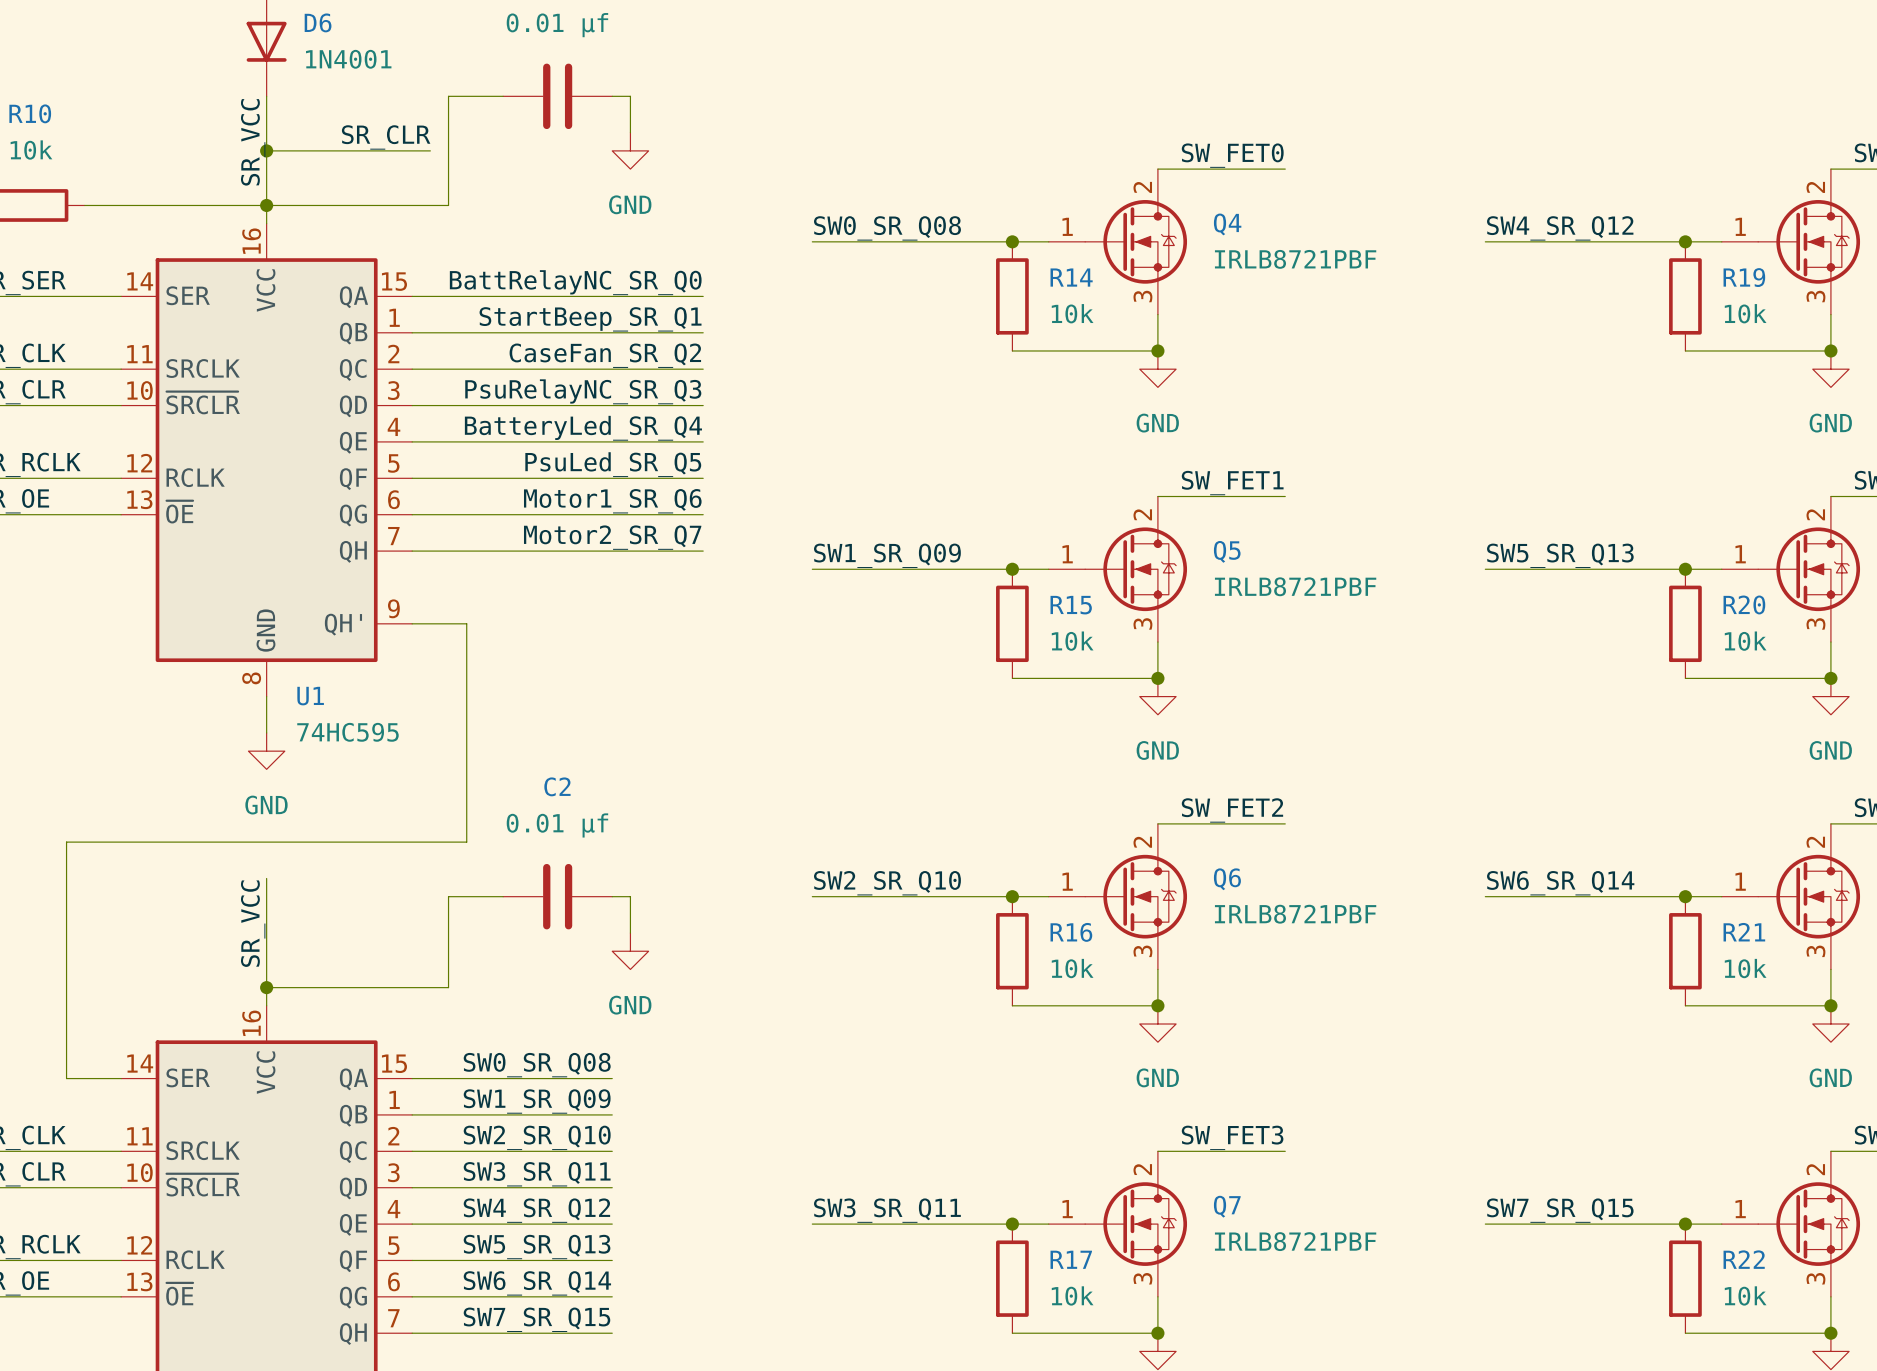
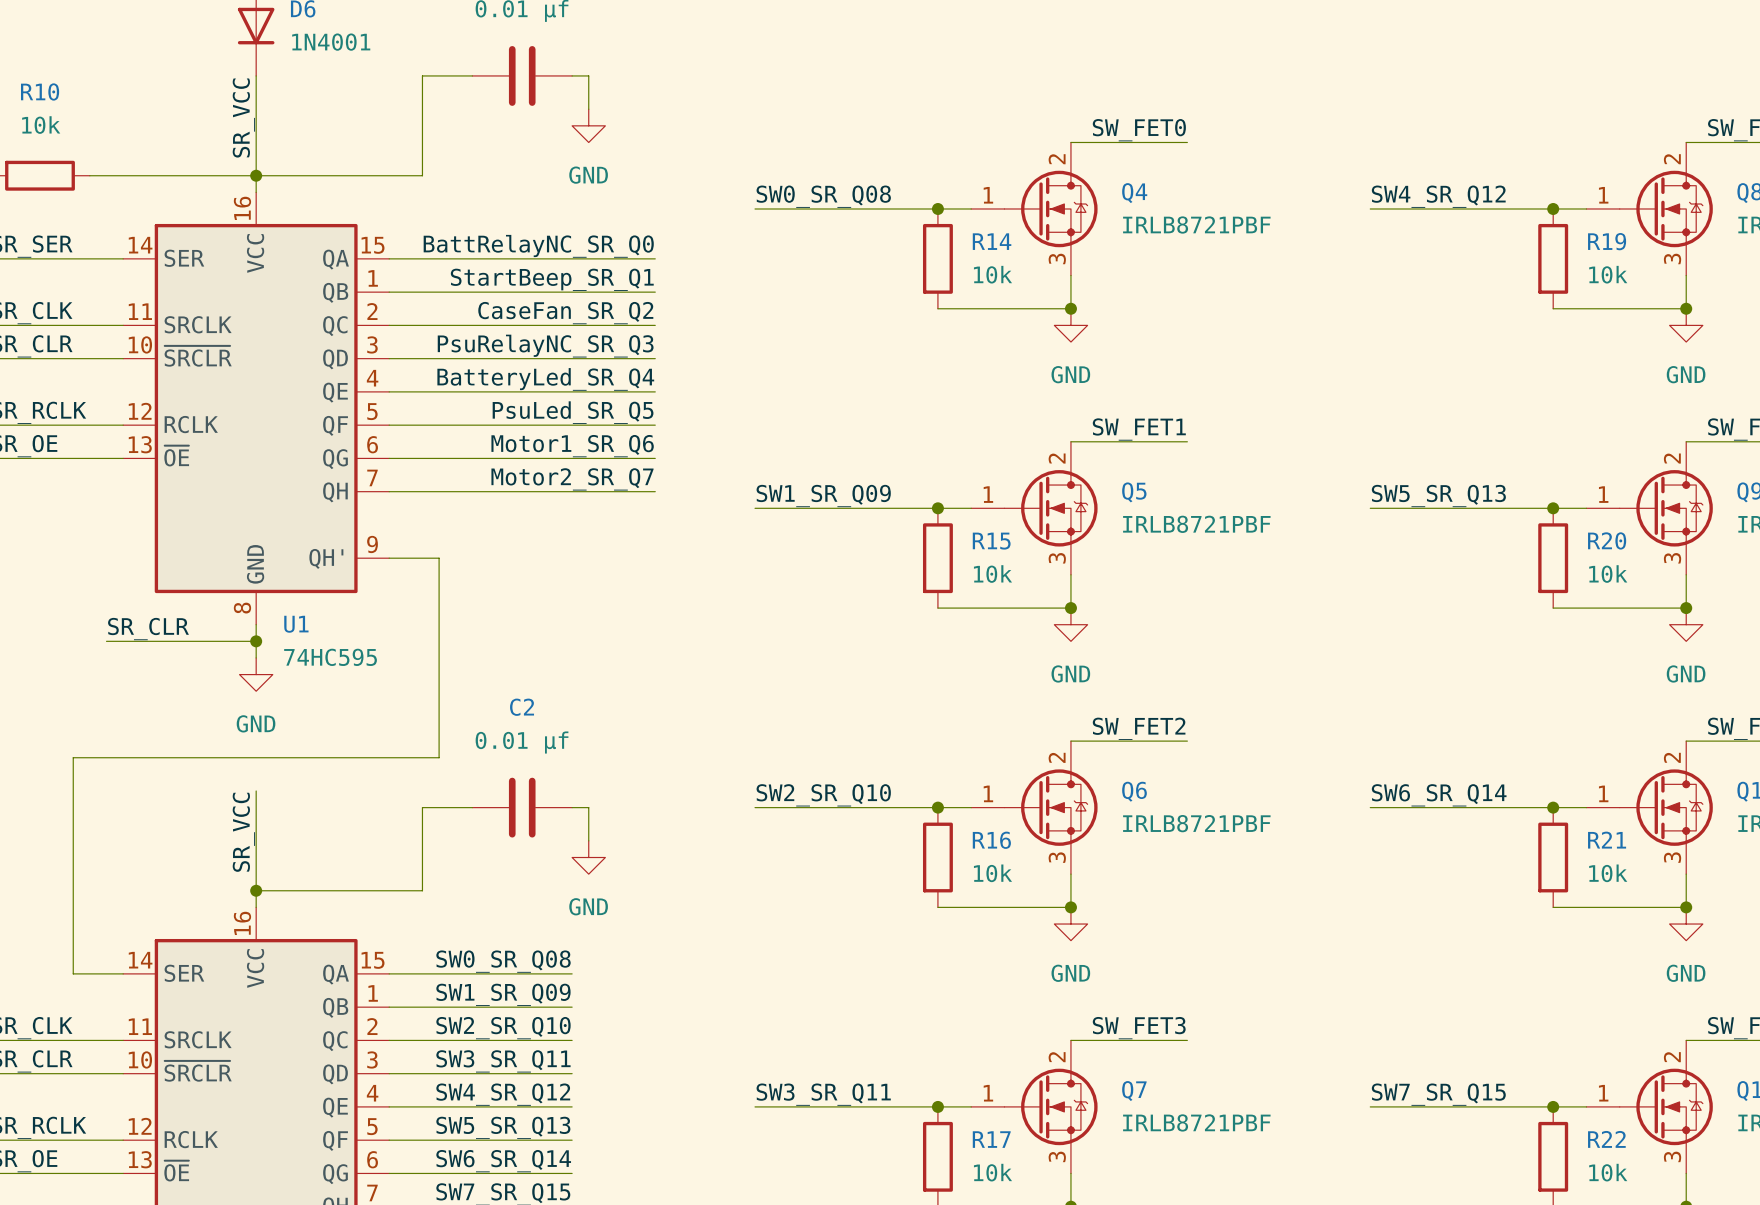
label: SR_CLR (386, 137) -> none
wire: (266, 150) (430, 150) -> none
junction: (266, 150) -> none
label: none -> SR_CLR (148, 629)
wire: none -> (106, 641) (256, 641)
junction: none -> (256, 641)

